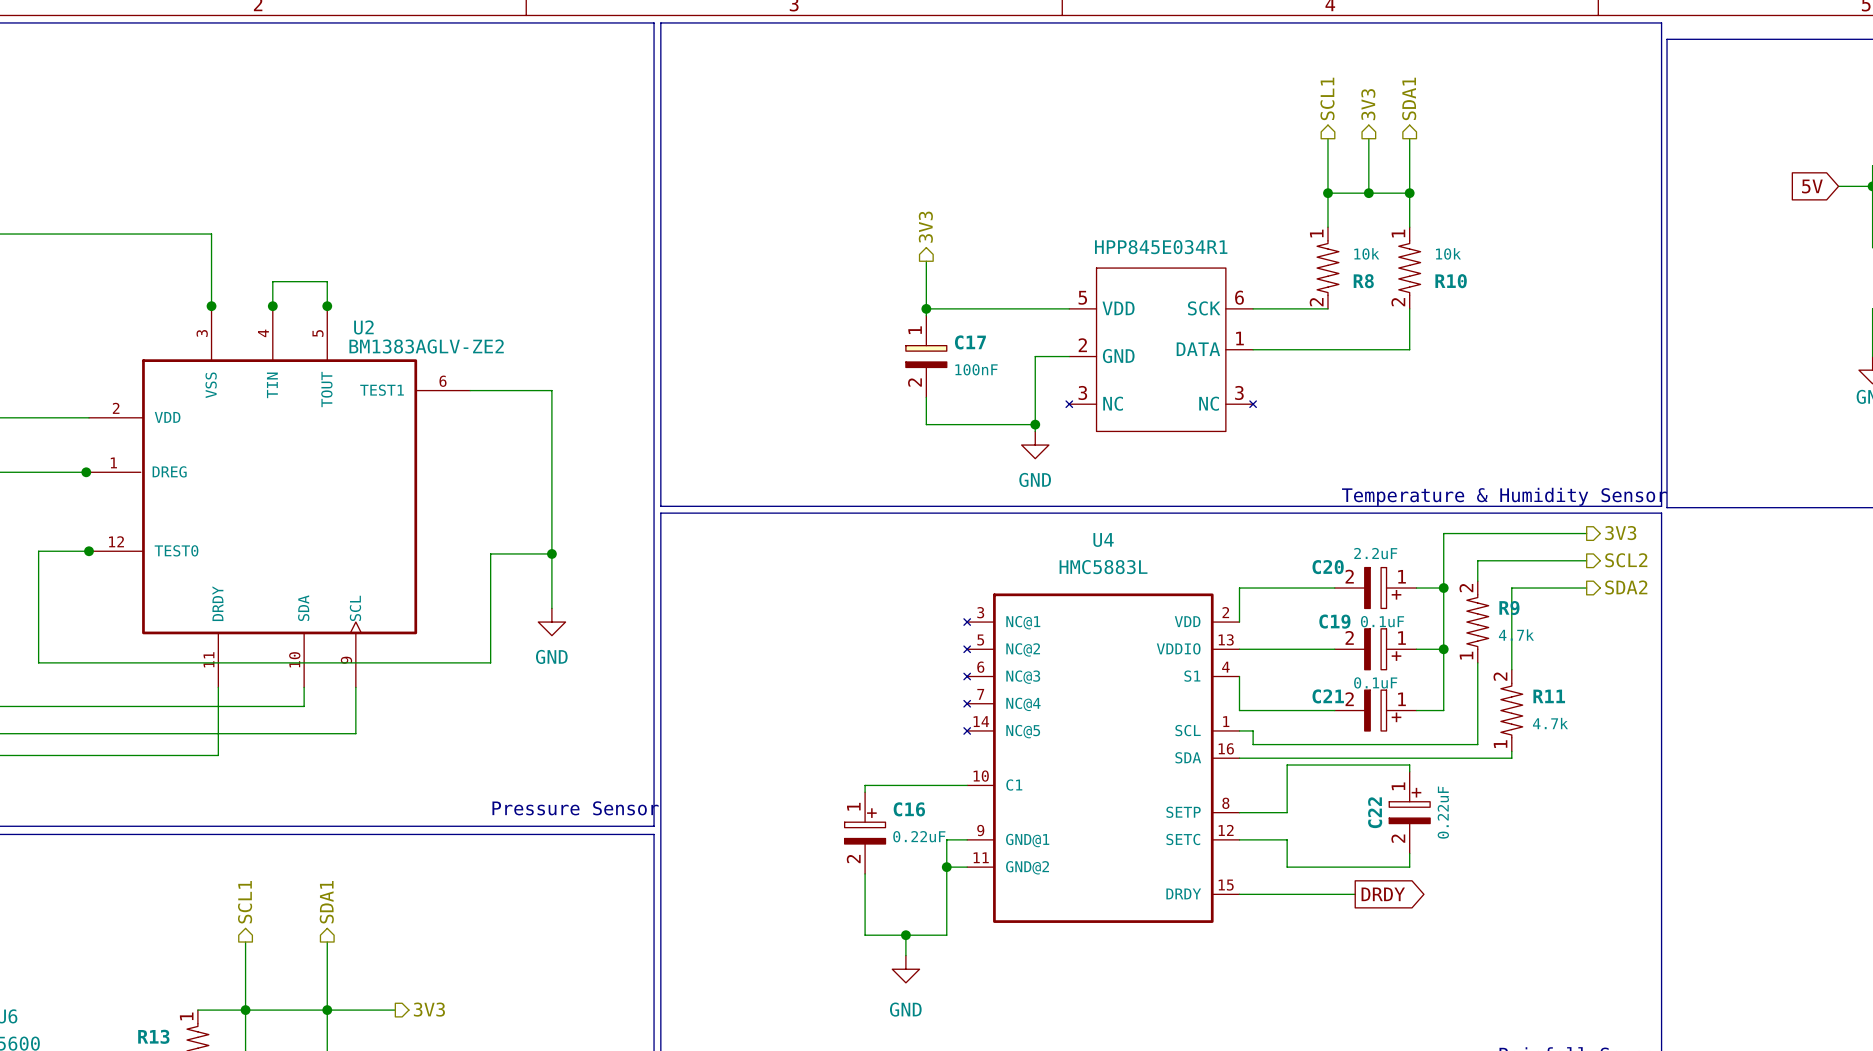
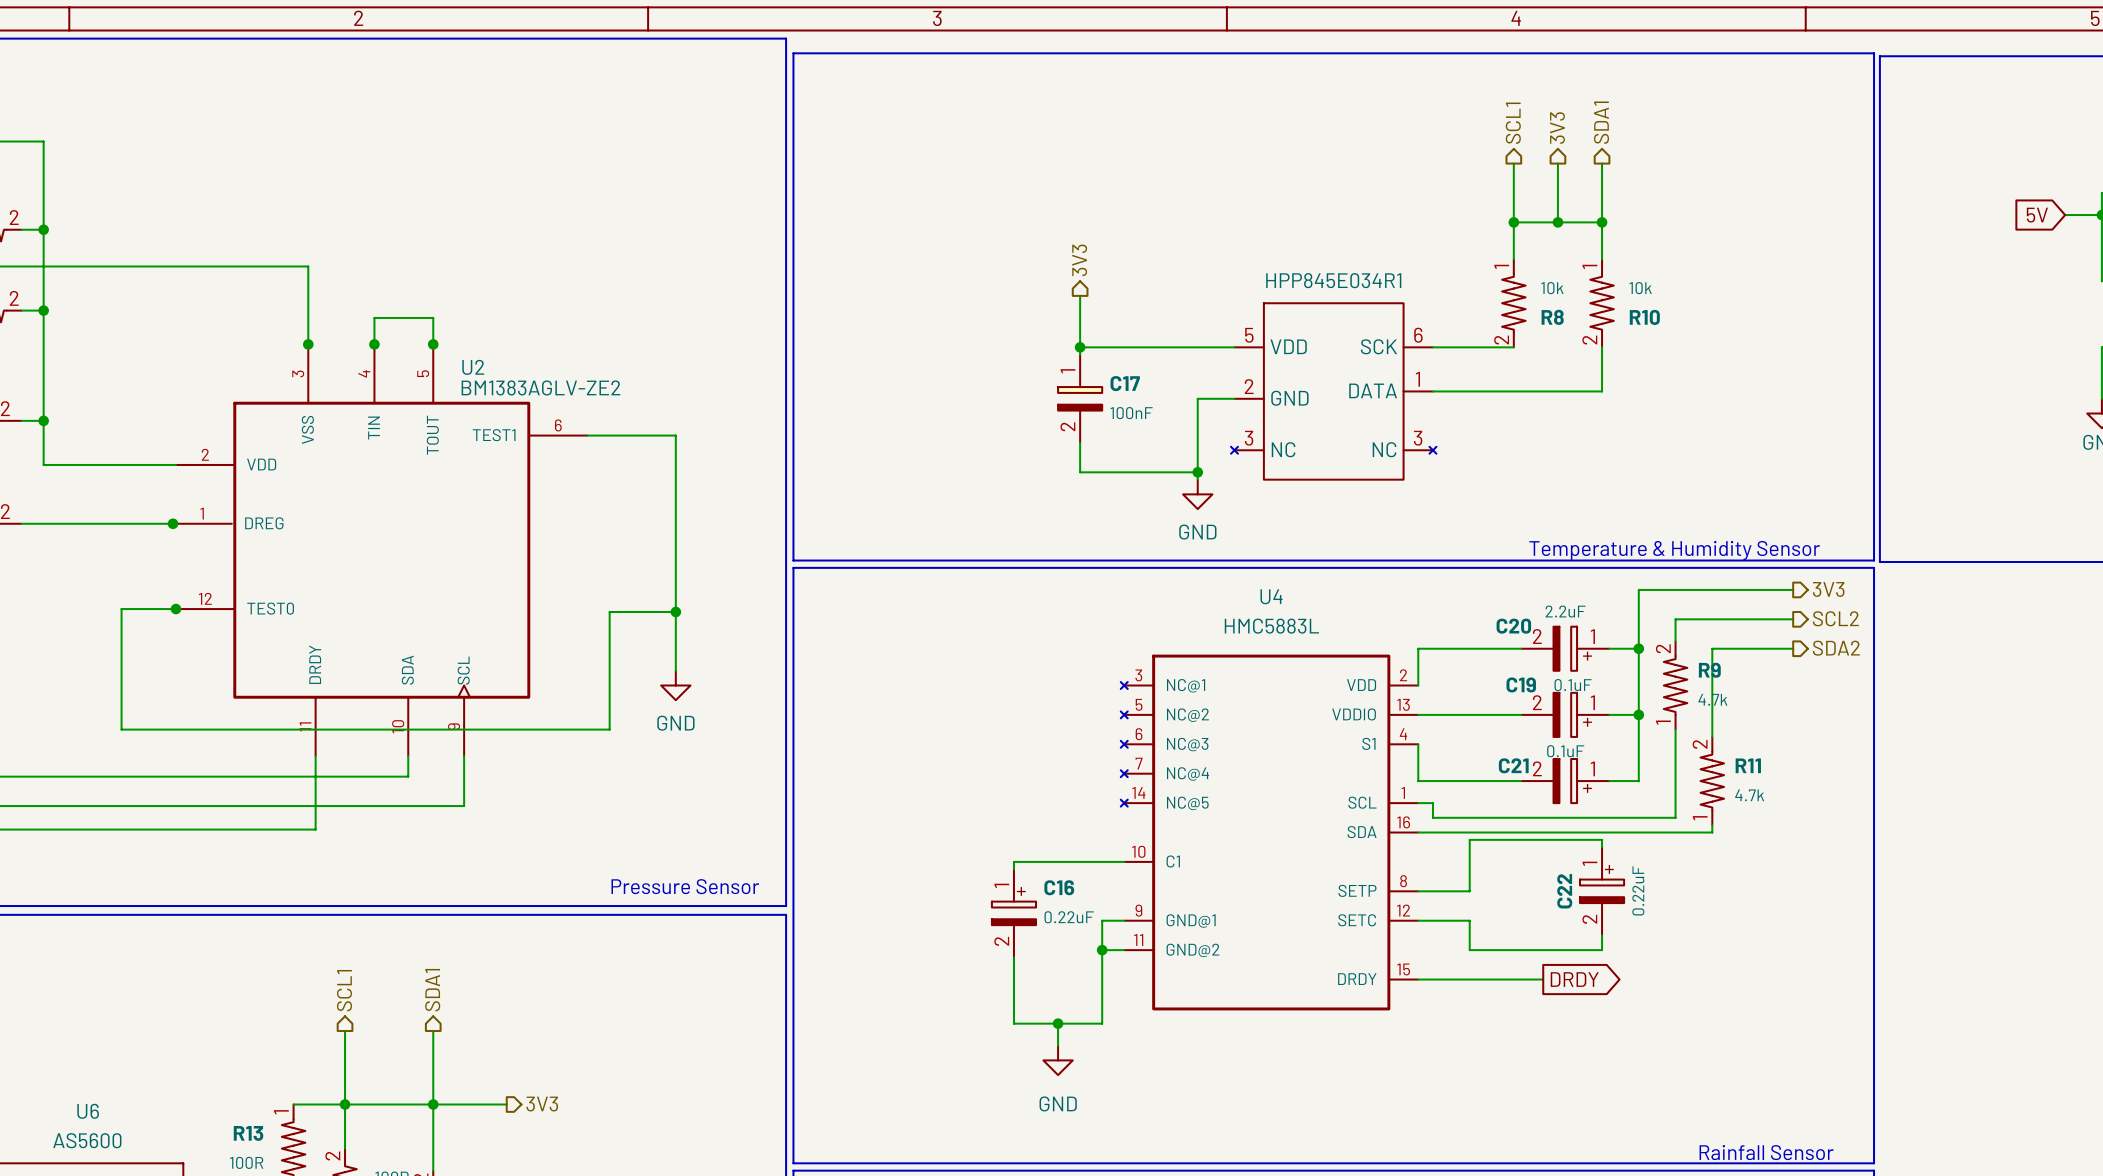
line: (660, 36) (660, 22) (1661, 22) (1661, 36) -> (793, 53) (1874, 53)

